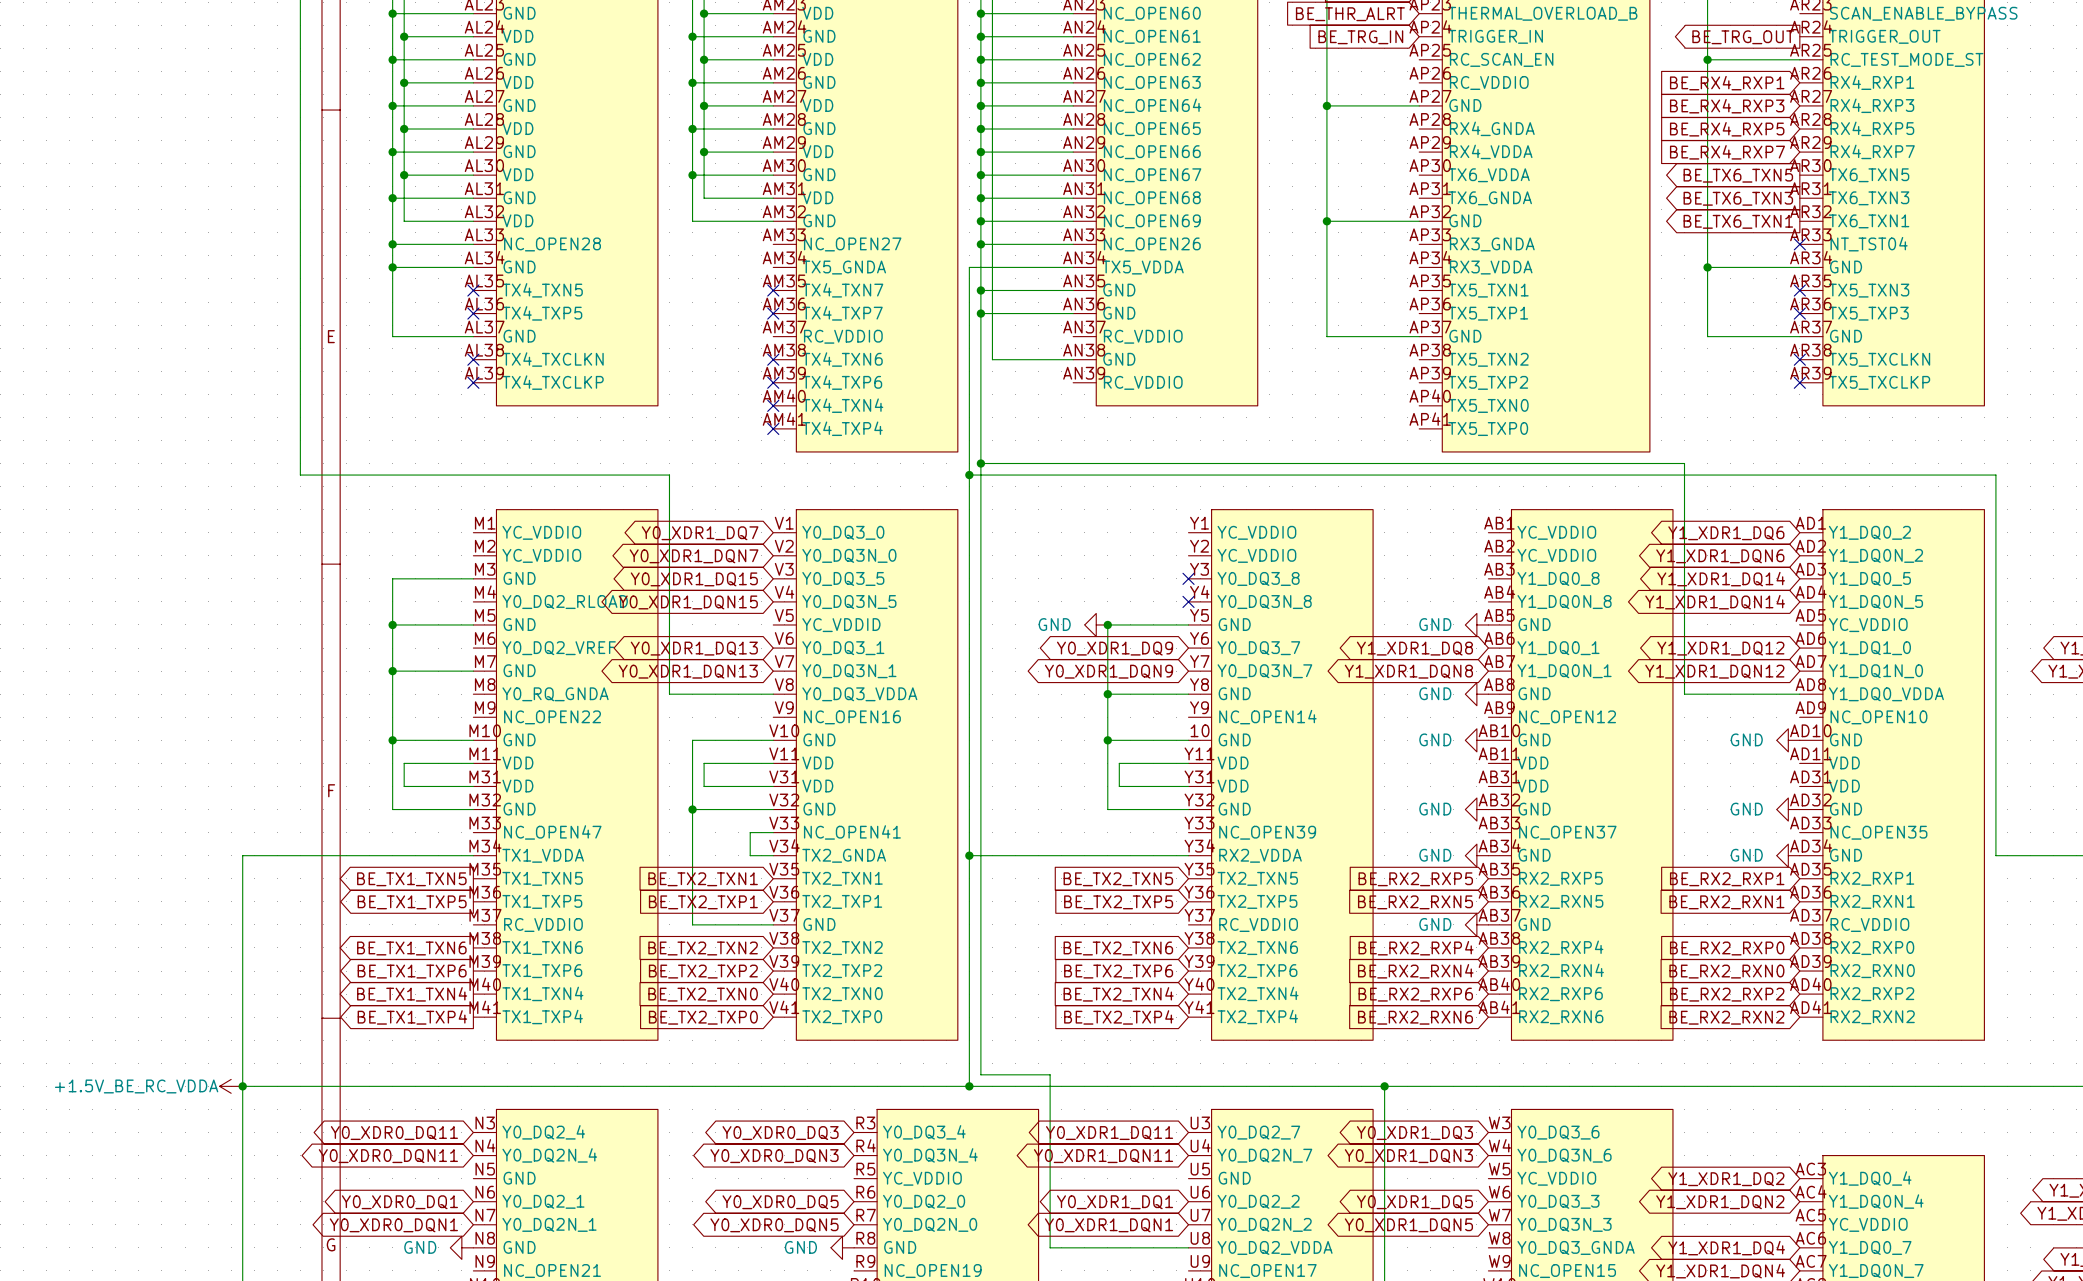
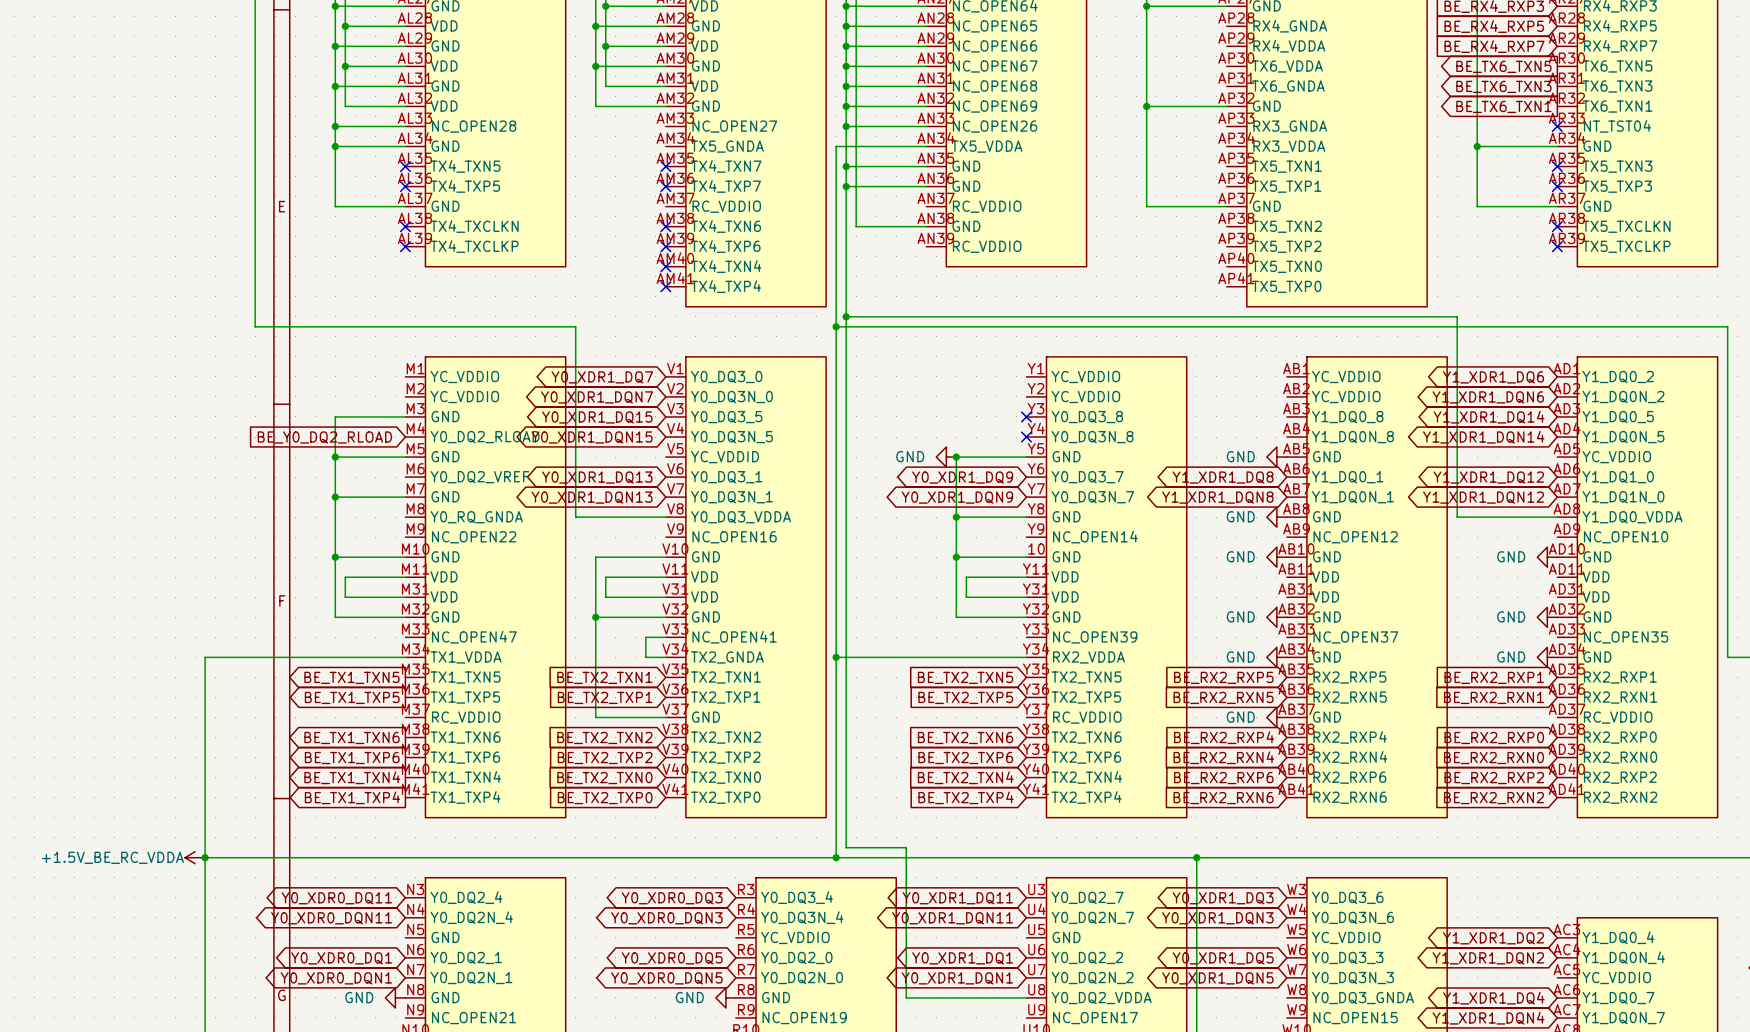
global label: none -> BE_Y0_DQ2_RLOAD (324, 437)

